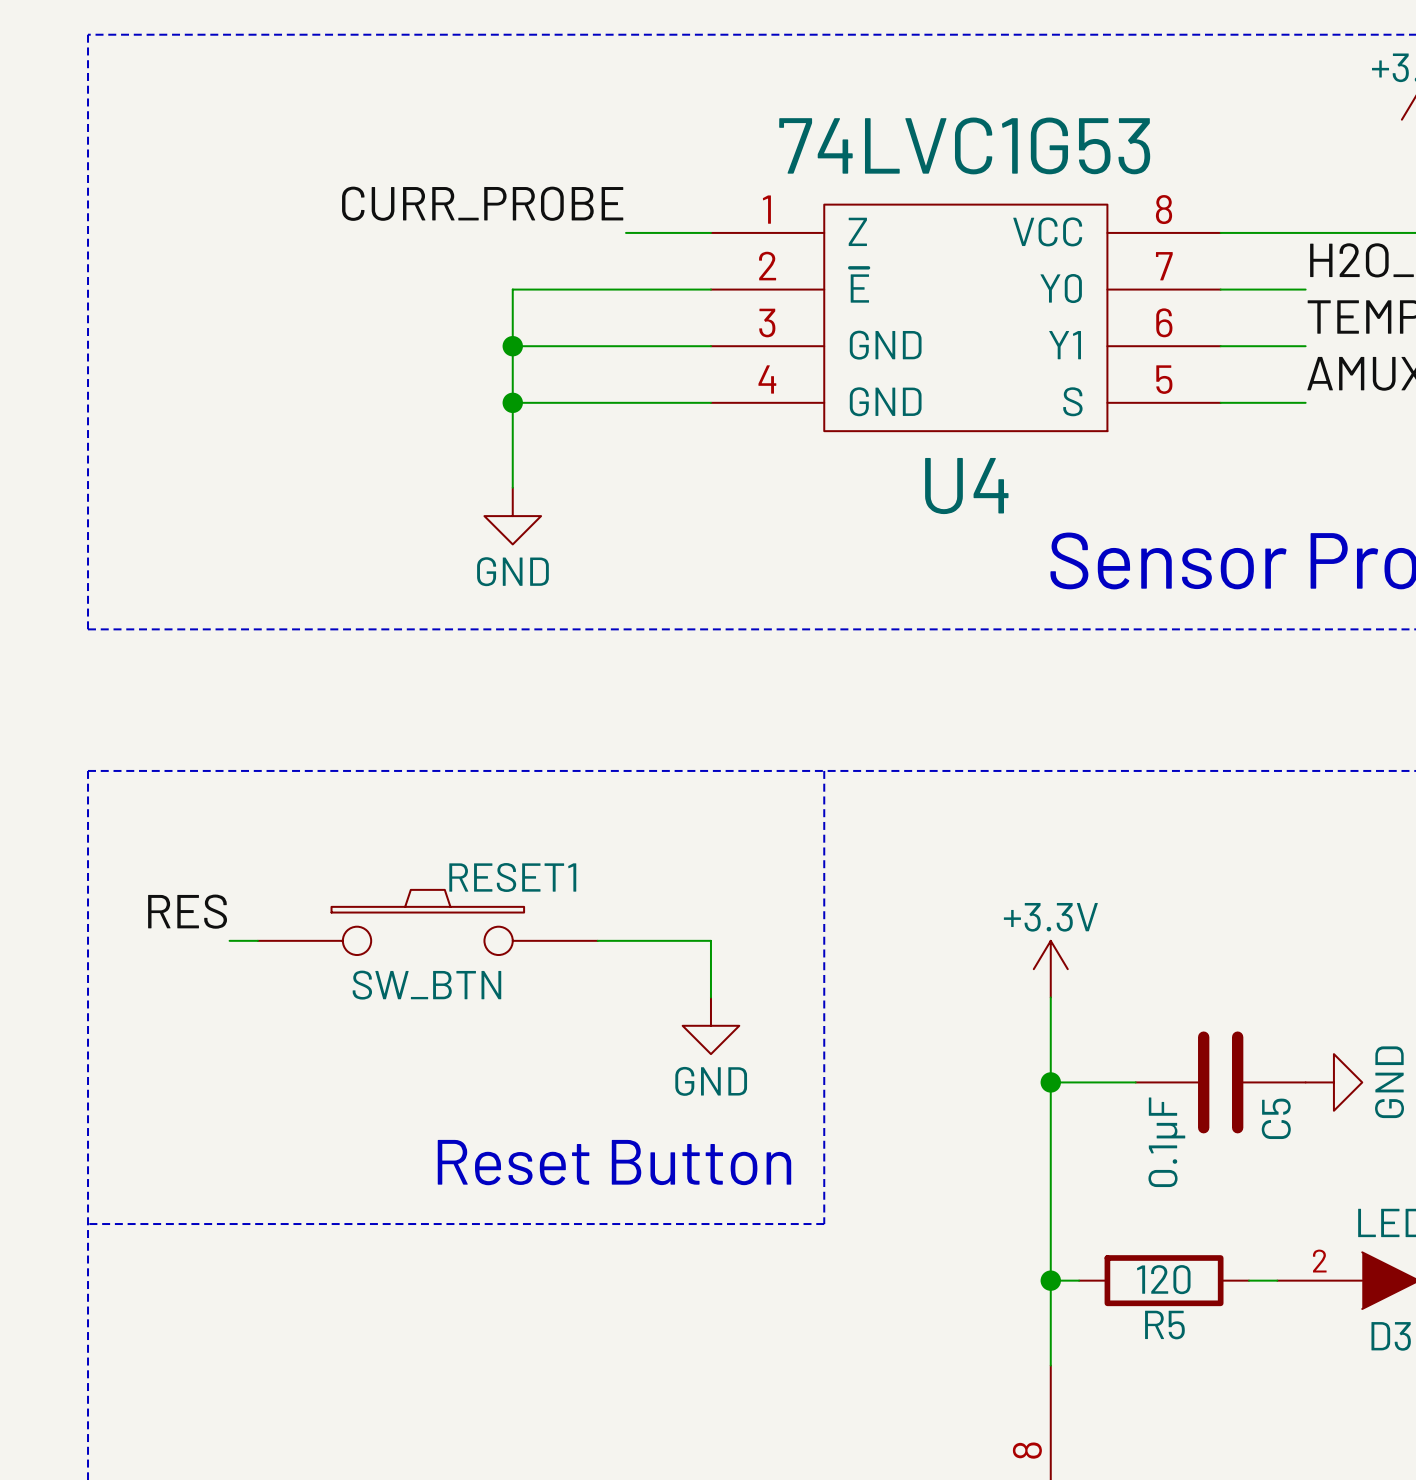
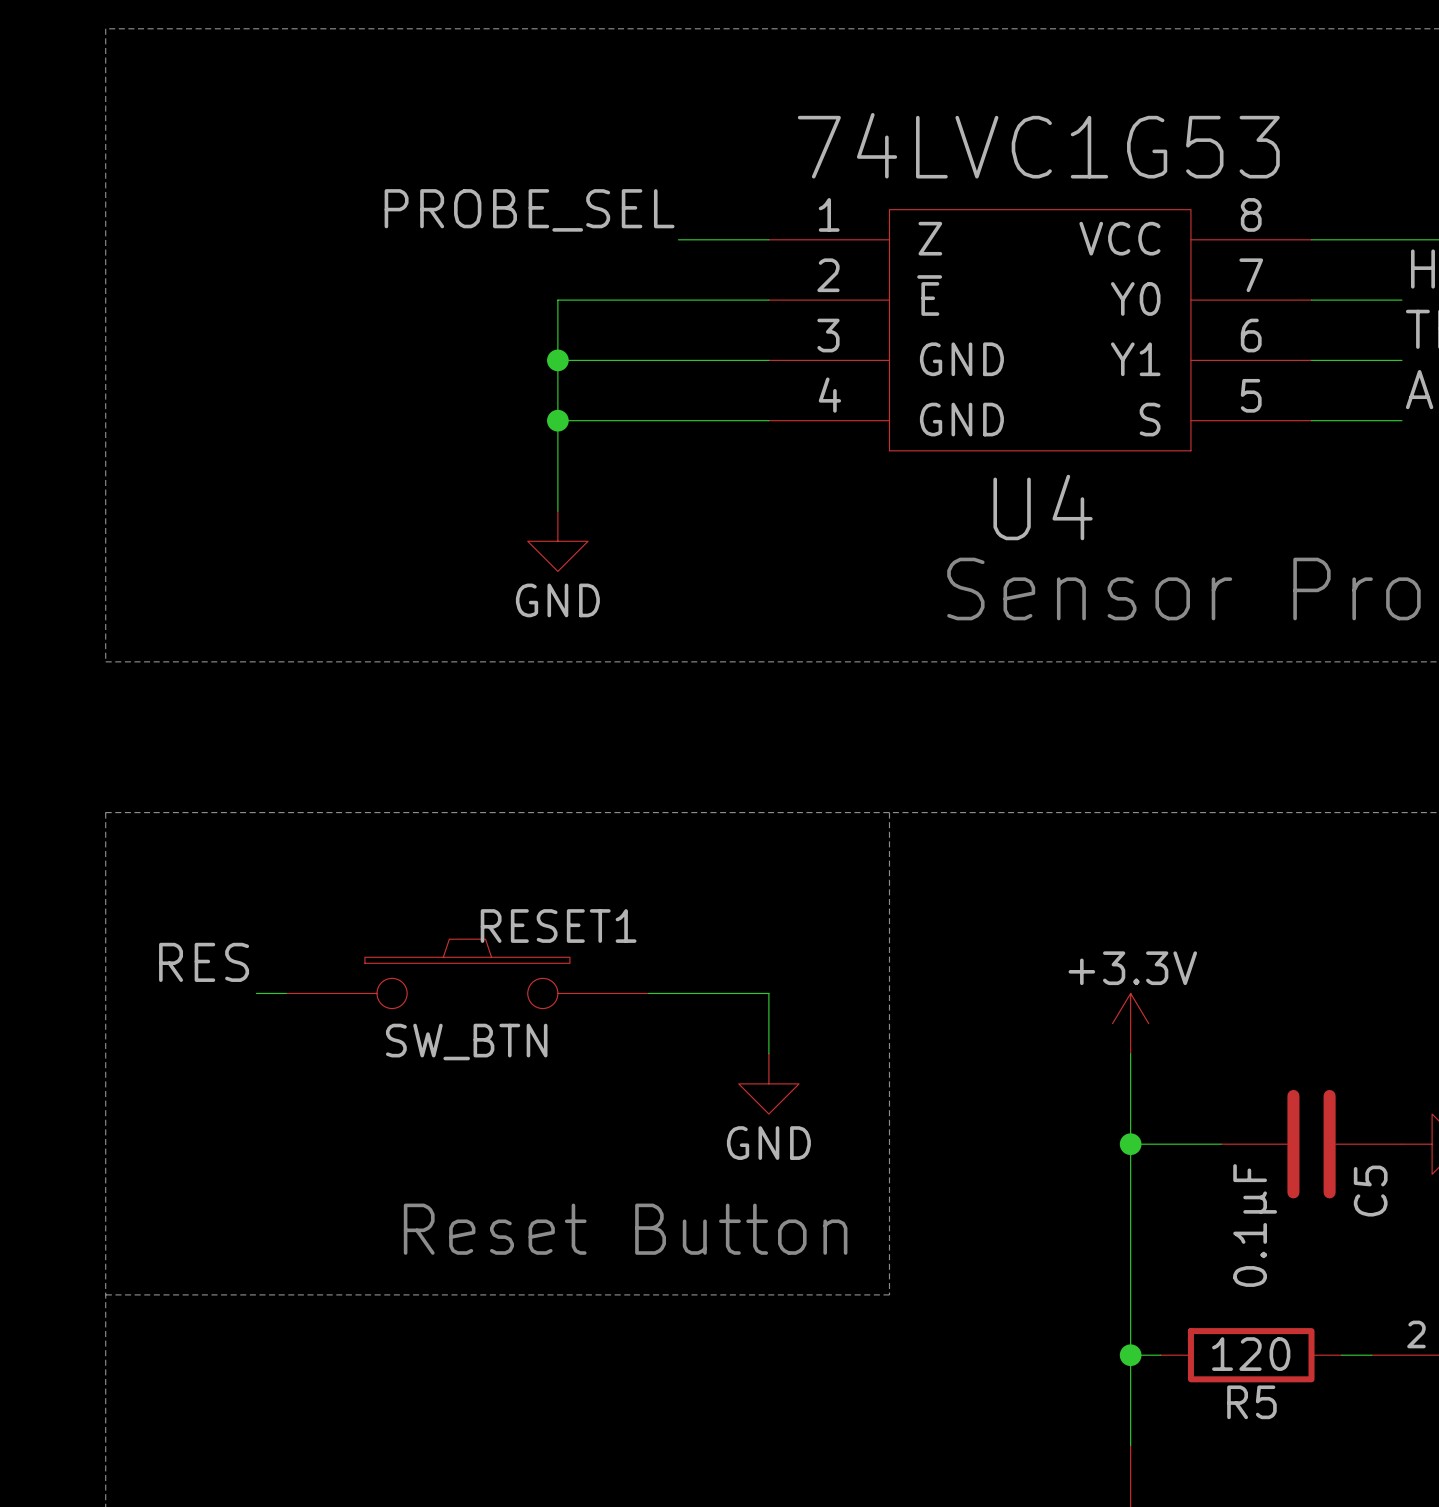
label: CURR_PROBE (482, 203) -> PROBE_SEL (529, 210)

